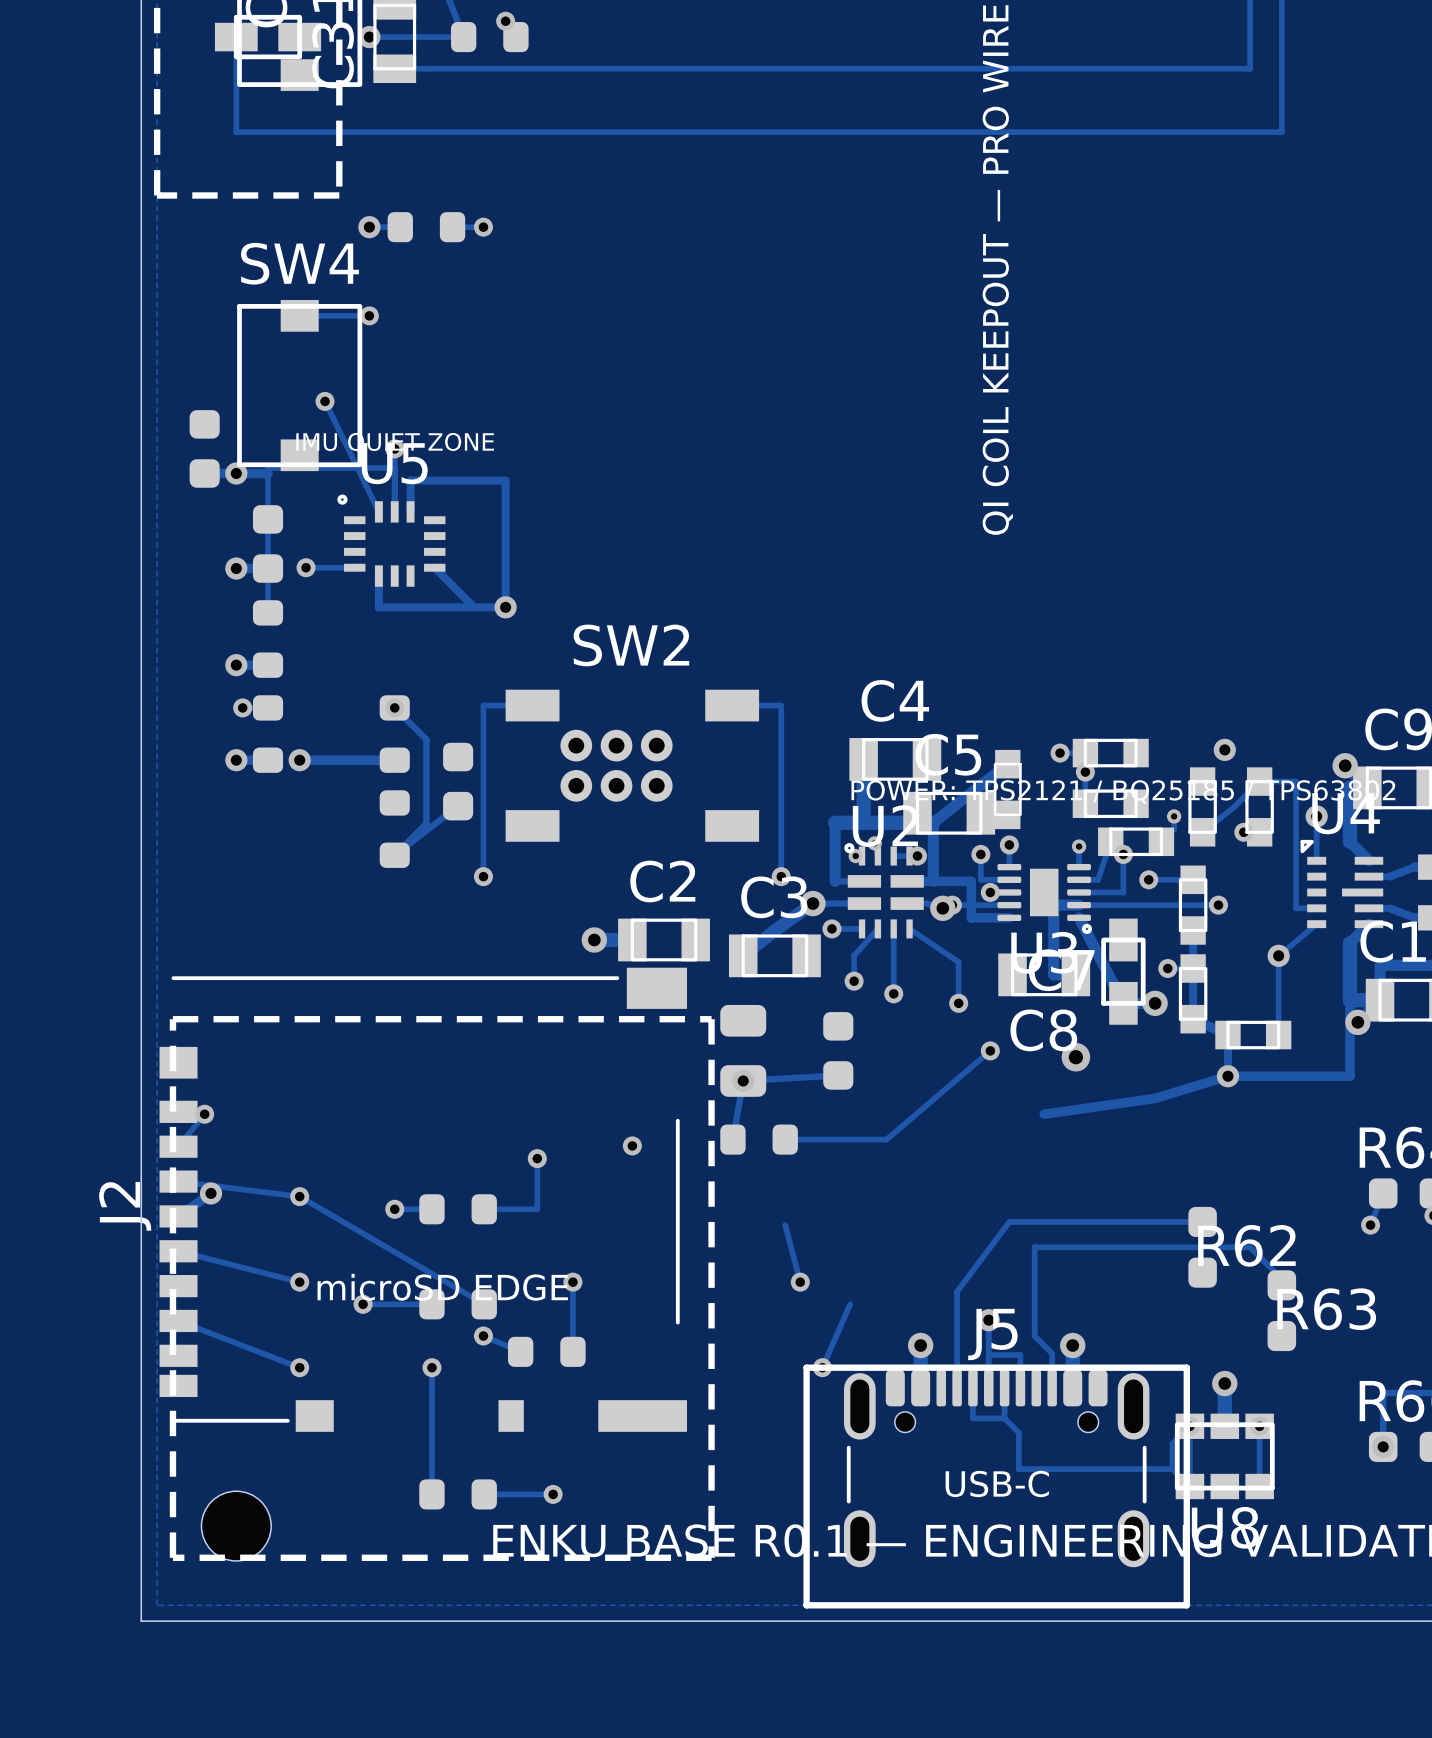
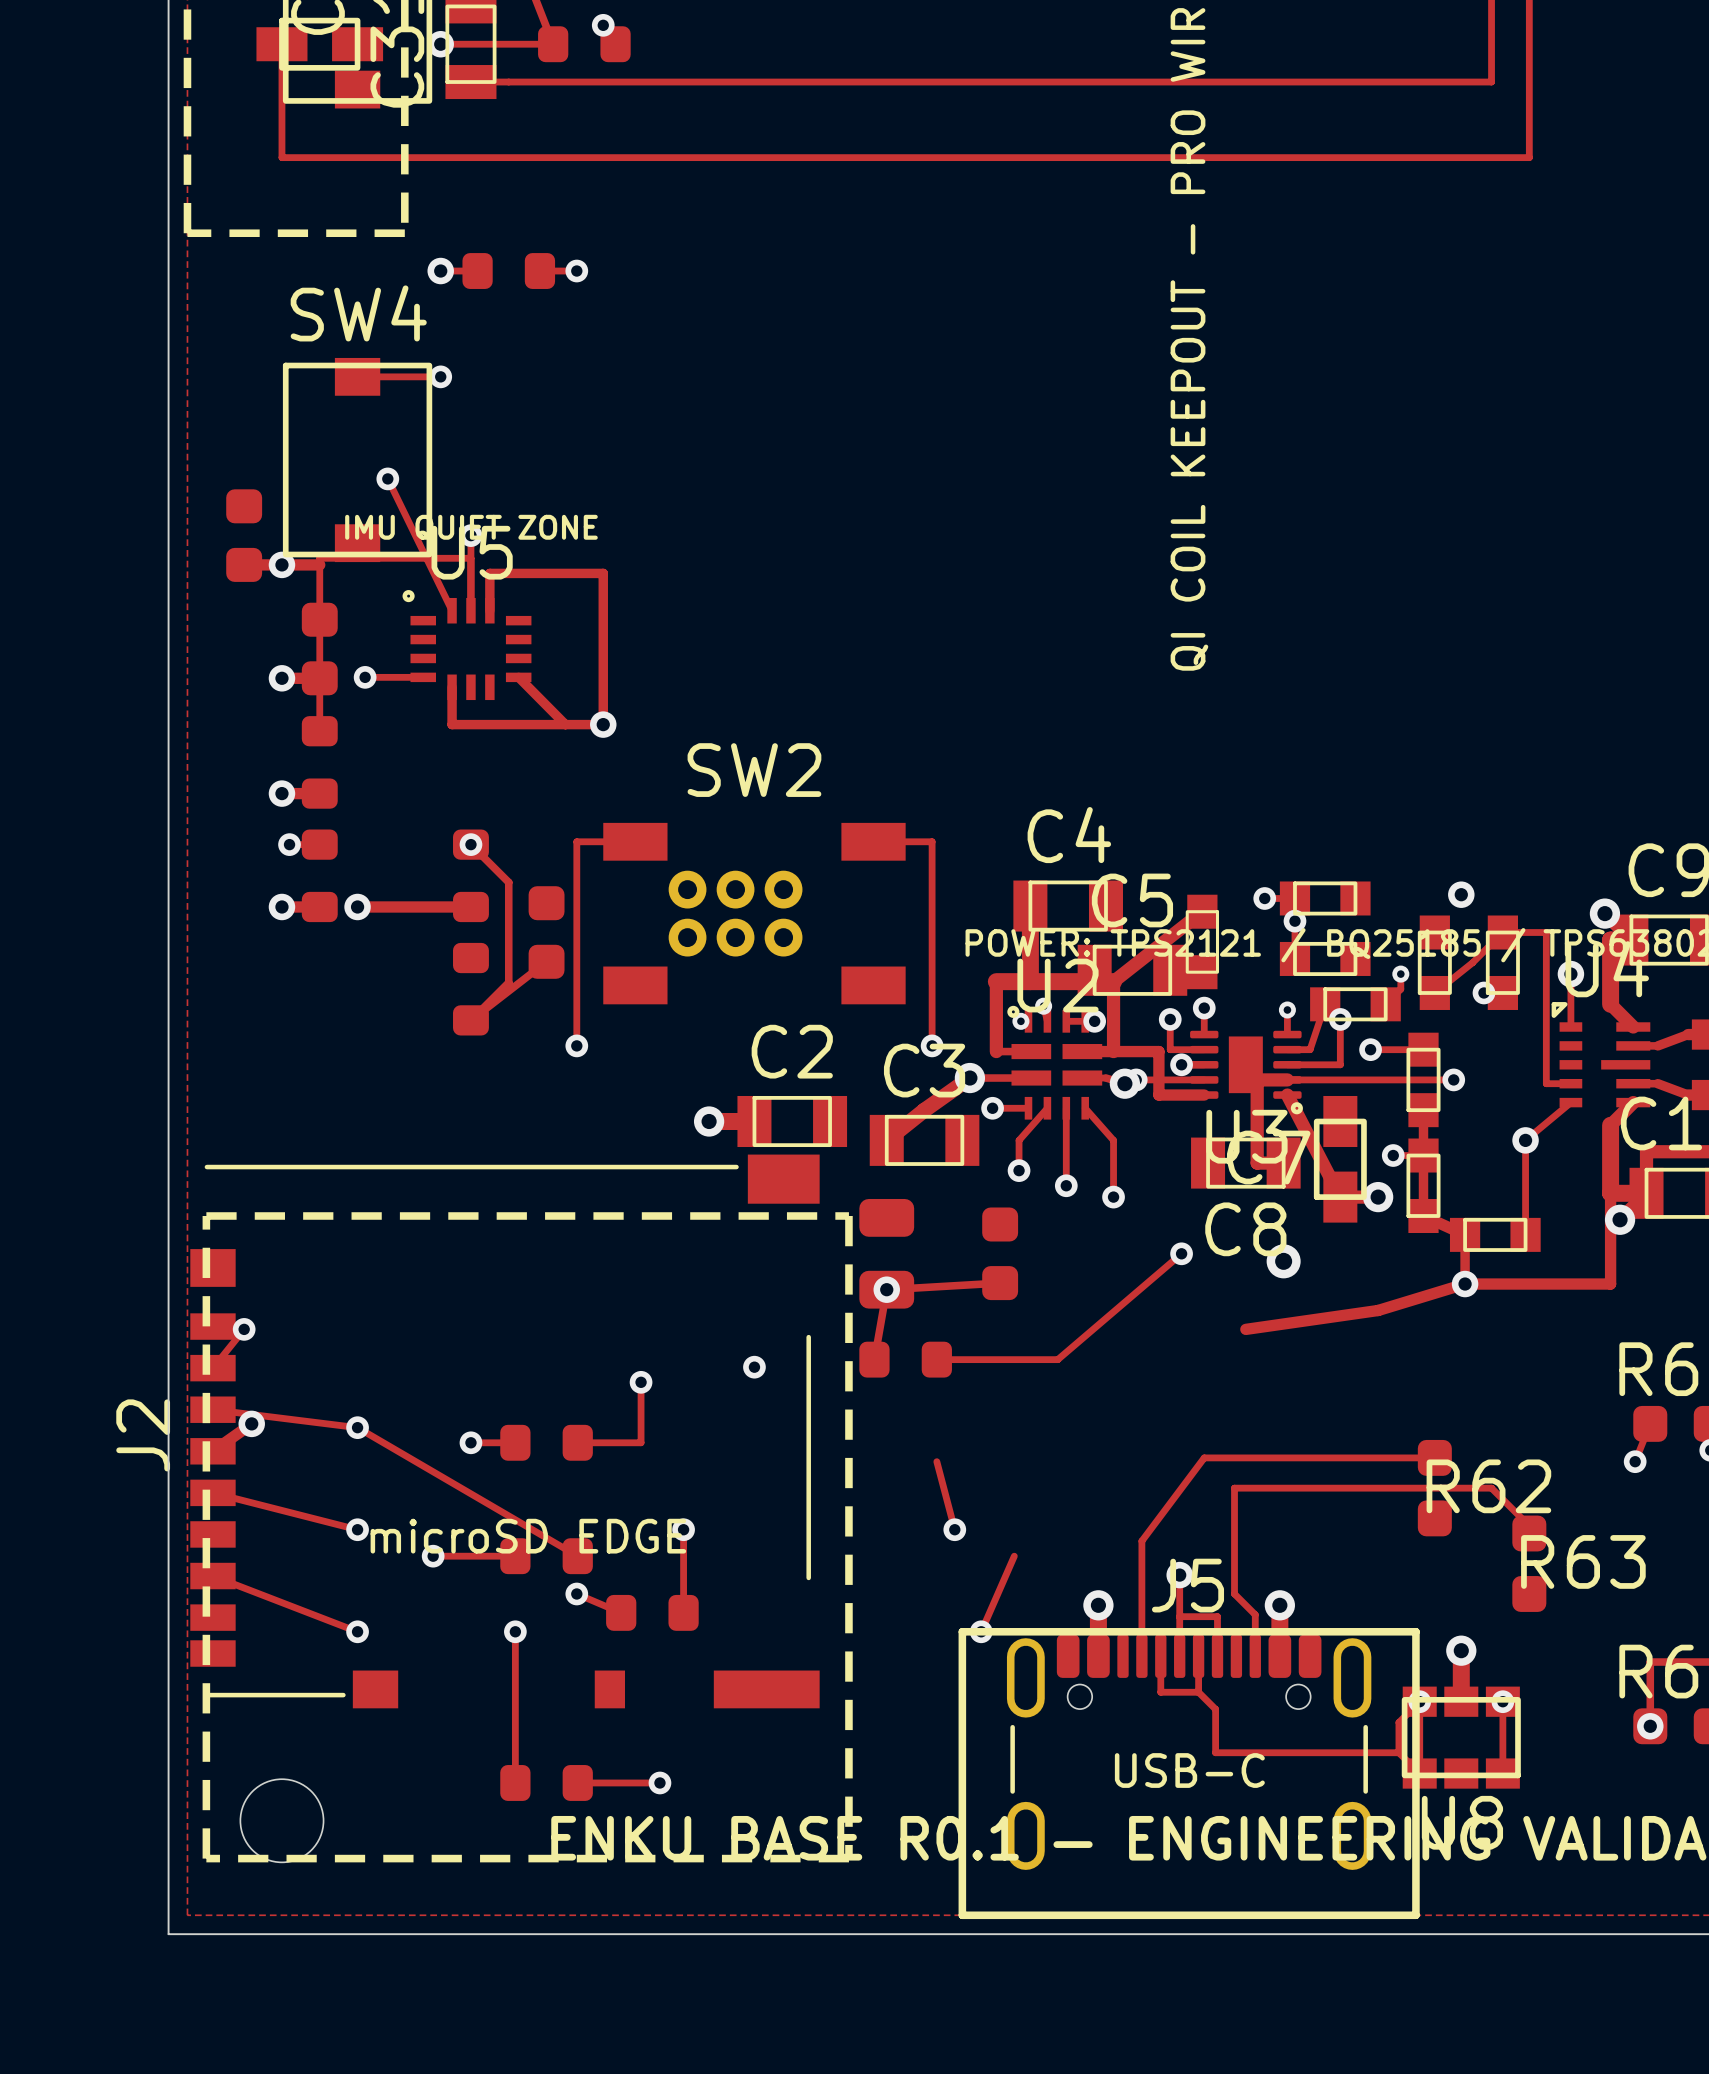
track: (909, 928) (958, 962) (958, 1003) -> (1085, 1108) (1113, 1140) (1113, 1197)
via position: (958, 1003) -> (1113, 1197)

